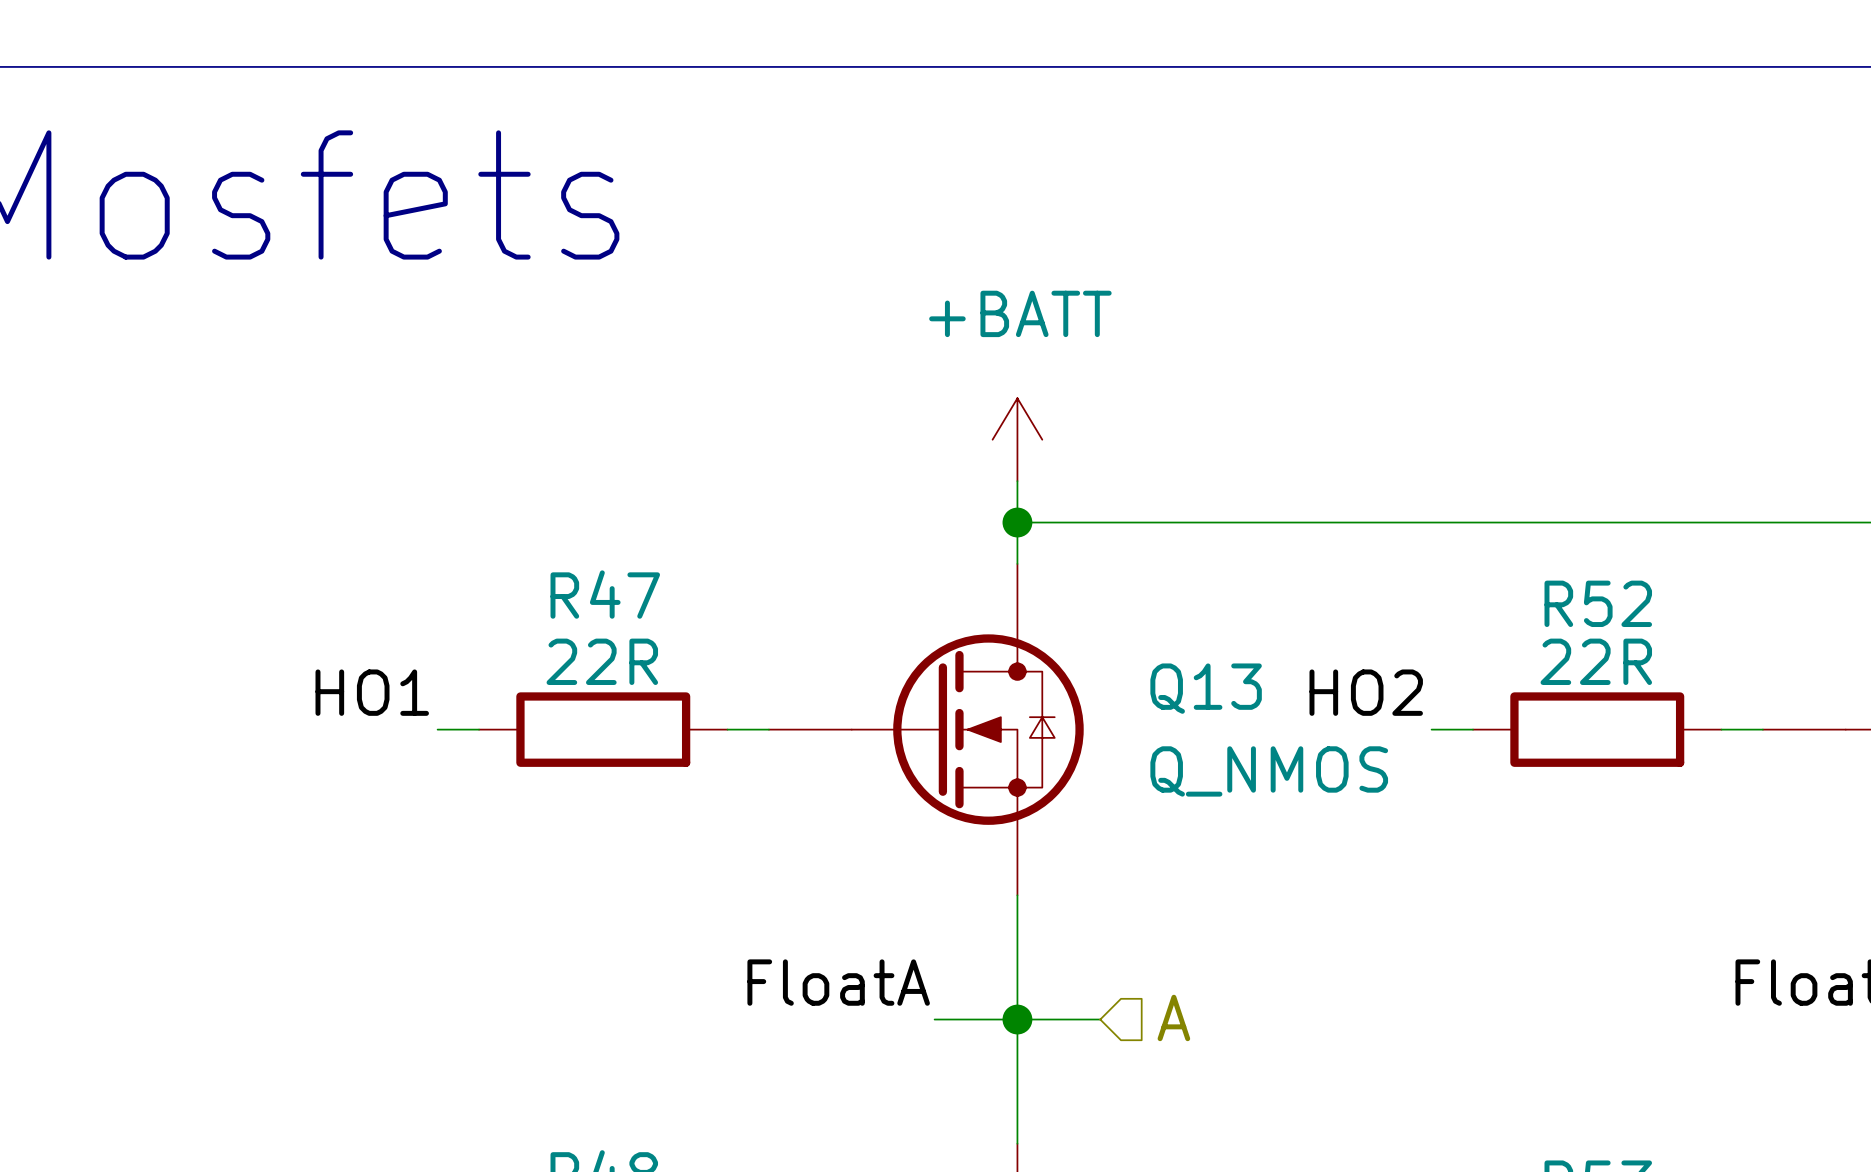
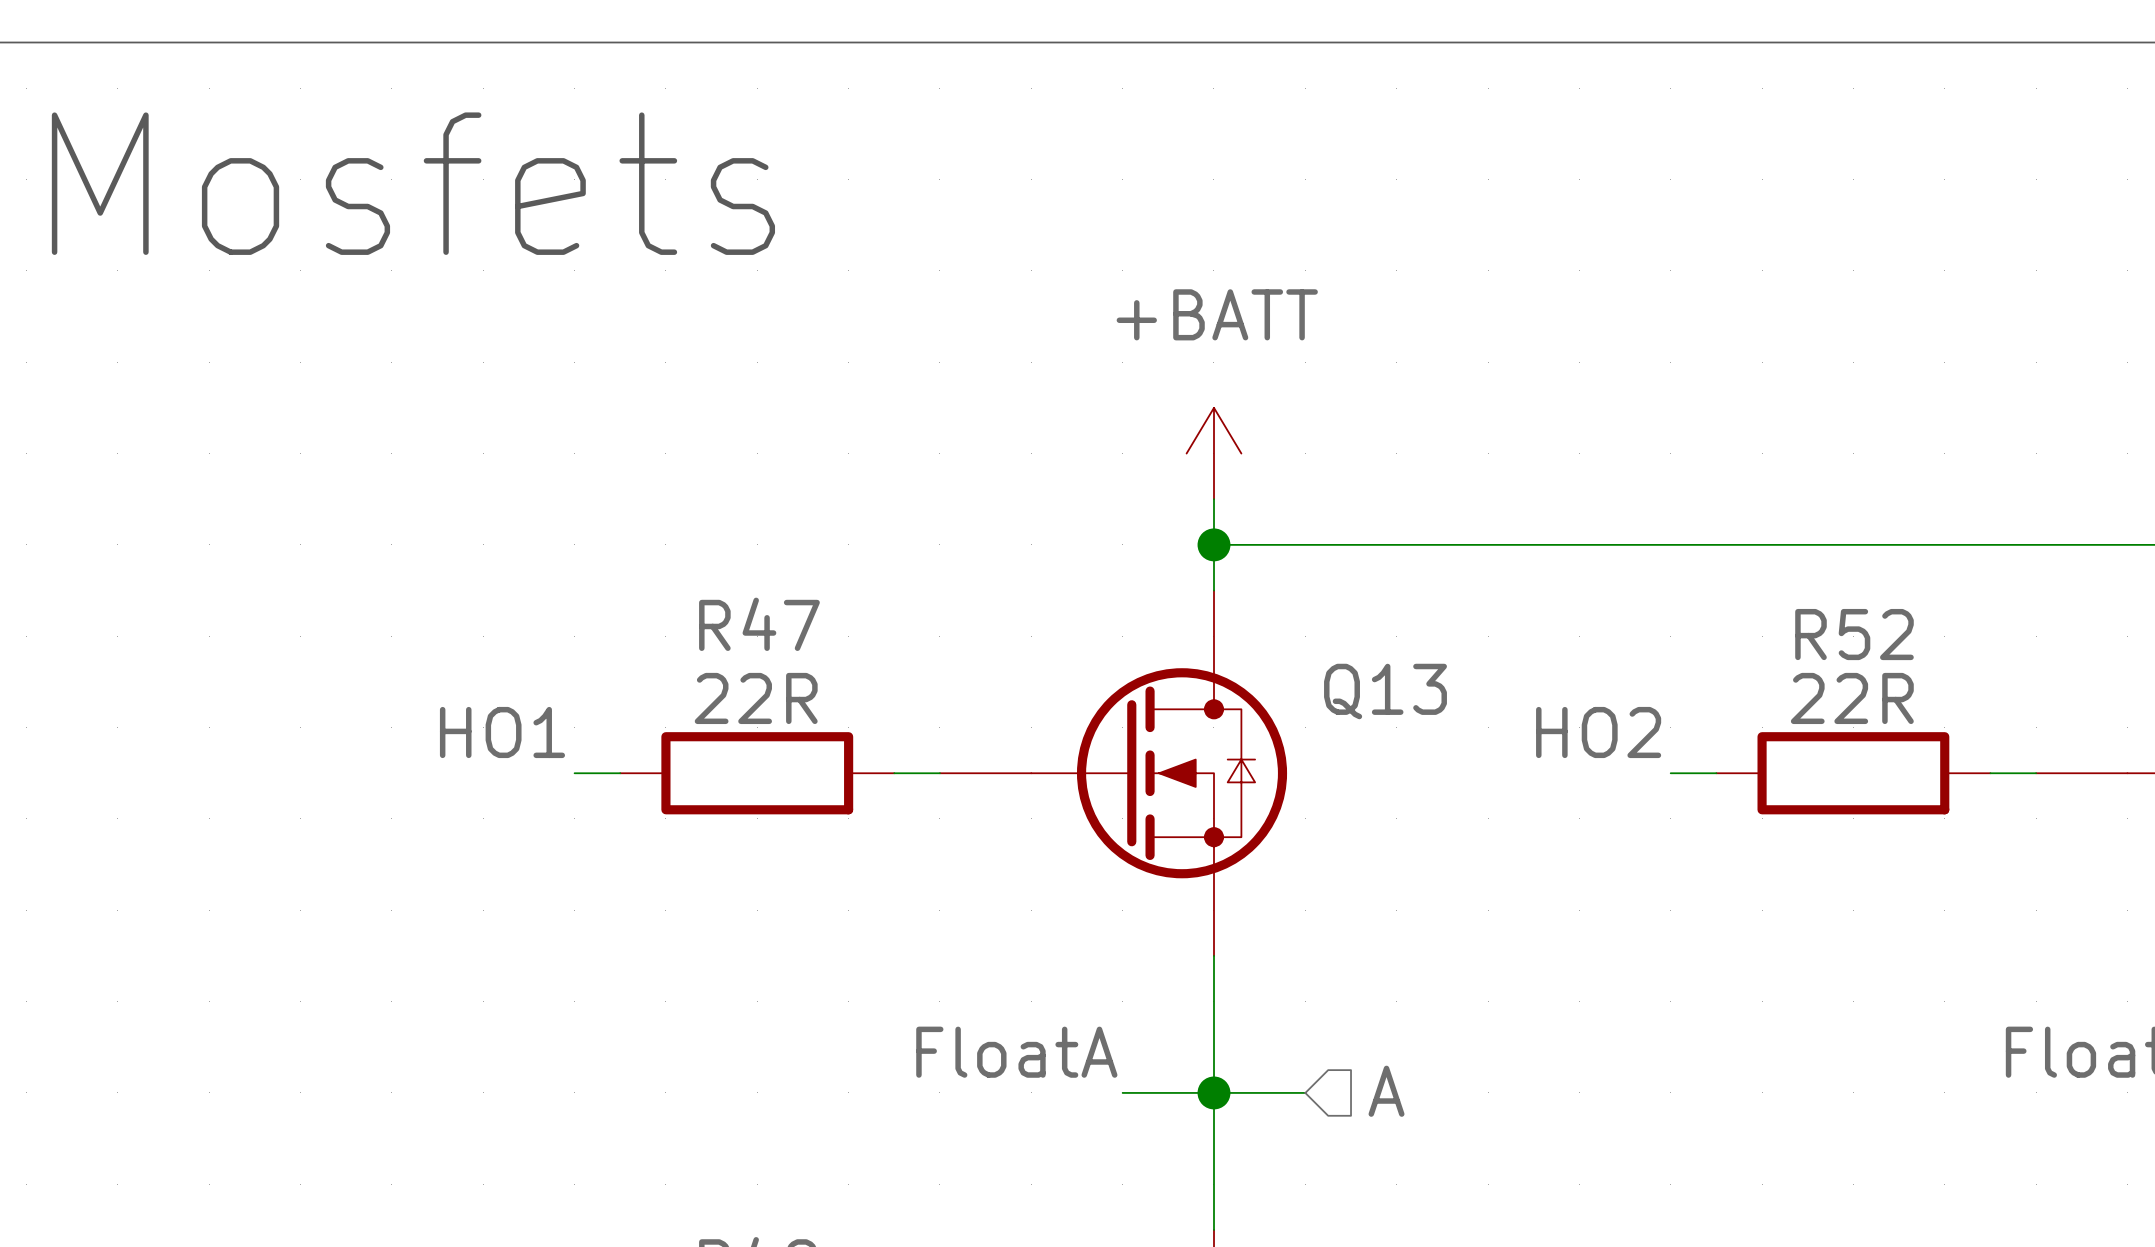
Q13 name position: Q13 (1206, 688) -> Q13 (1385, 691)
Q13 value: Q_NMOS (1269, 771) -> none

